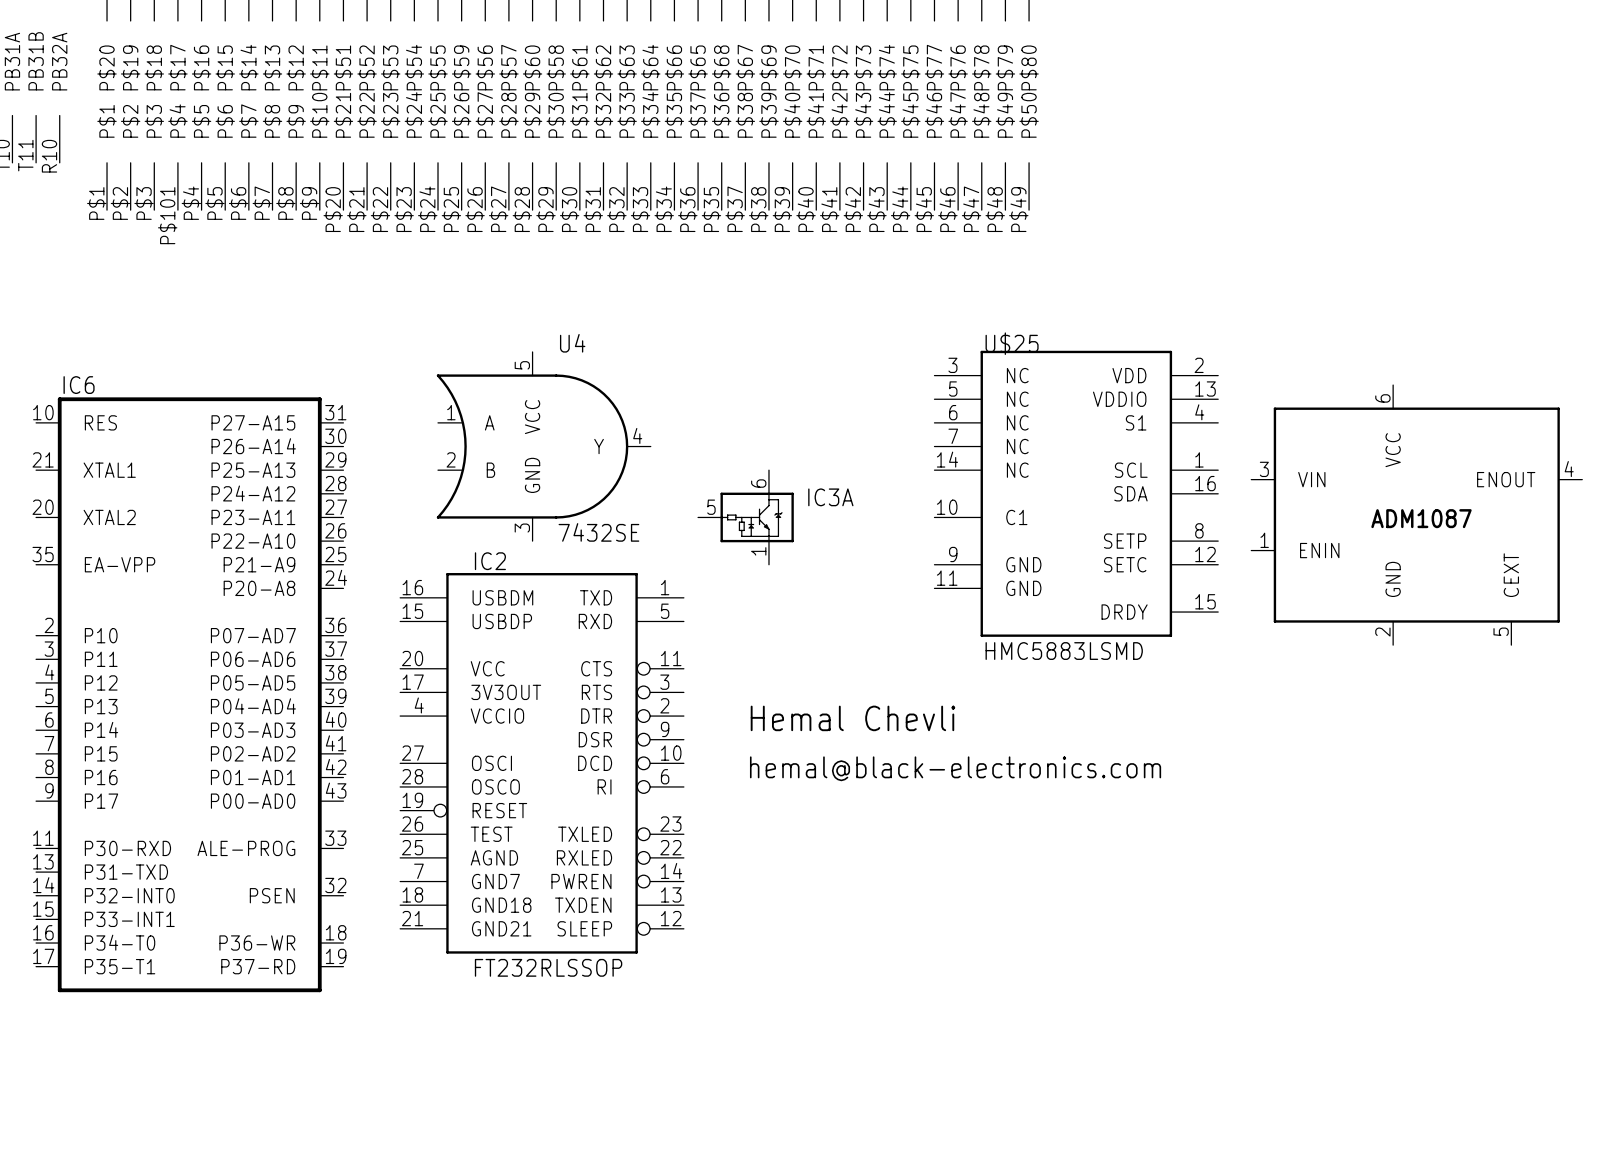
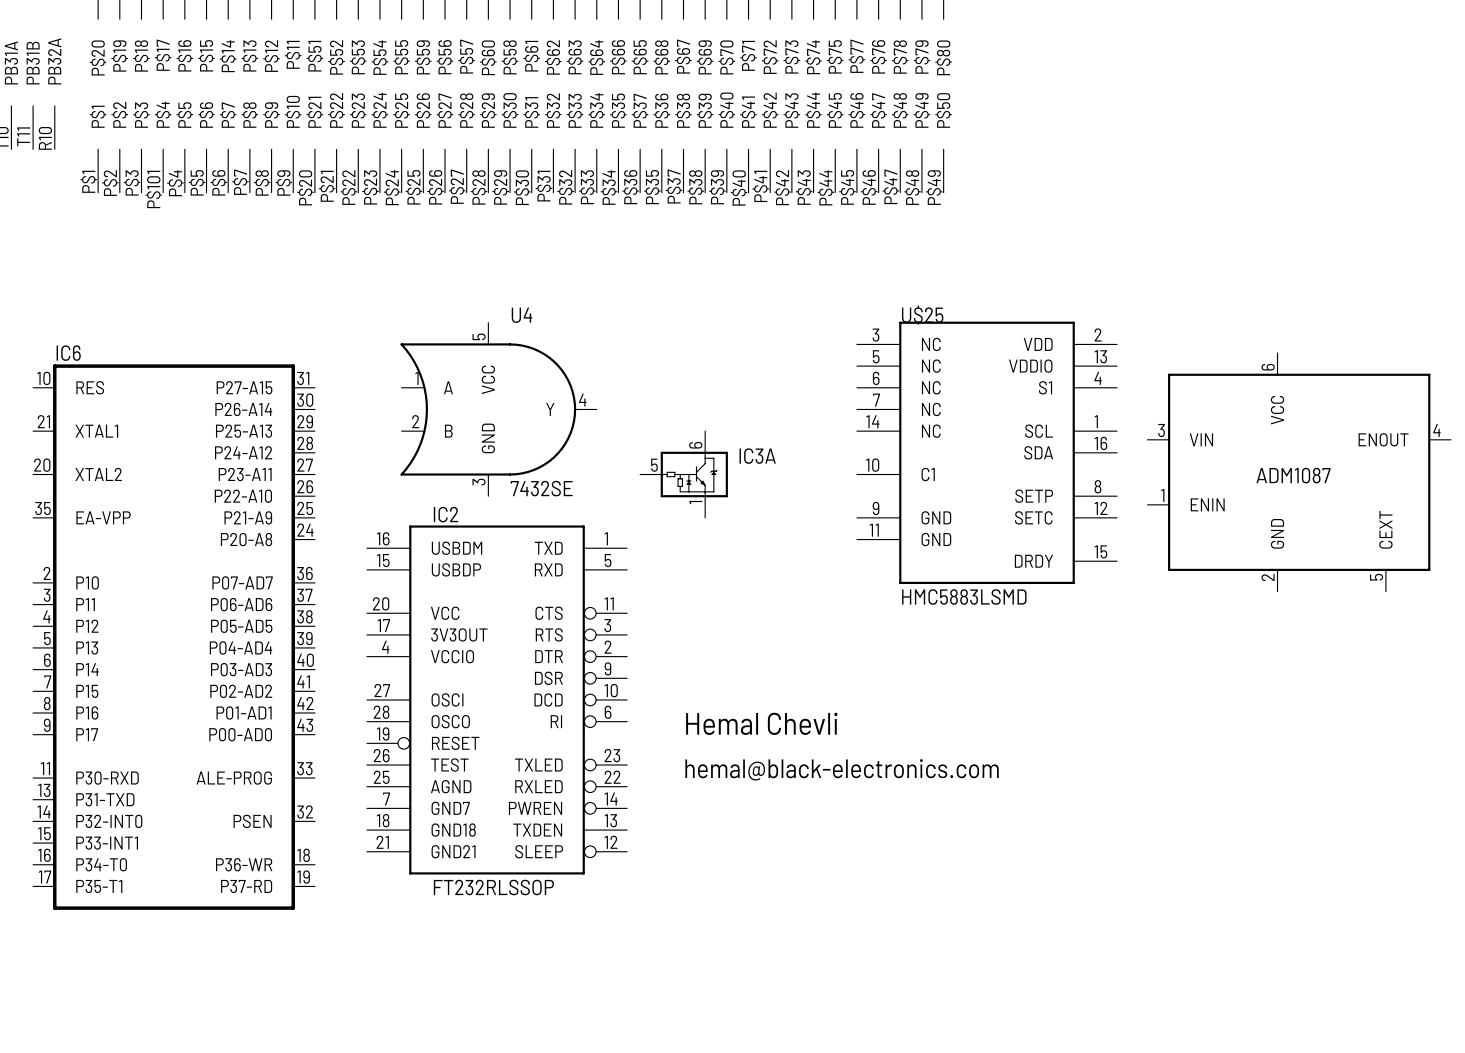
text position: Hemal Chevli (852, 718) -> Hemal Chevli (761, 723)
text position: hemal@black-electronics.com (955, 768) -> hemal@black-electronics.com (842, 769)

